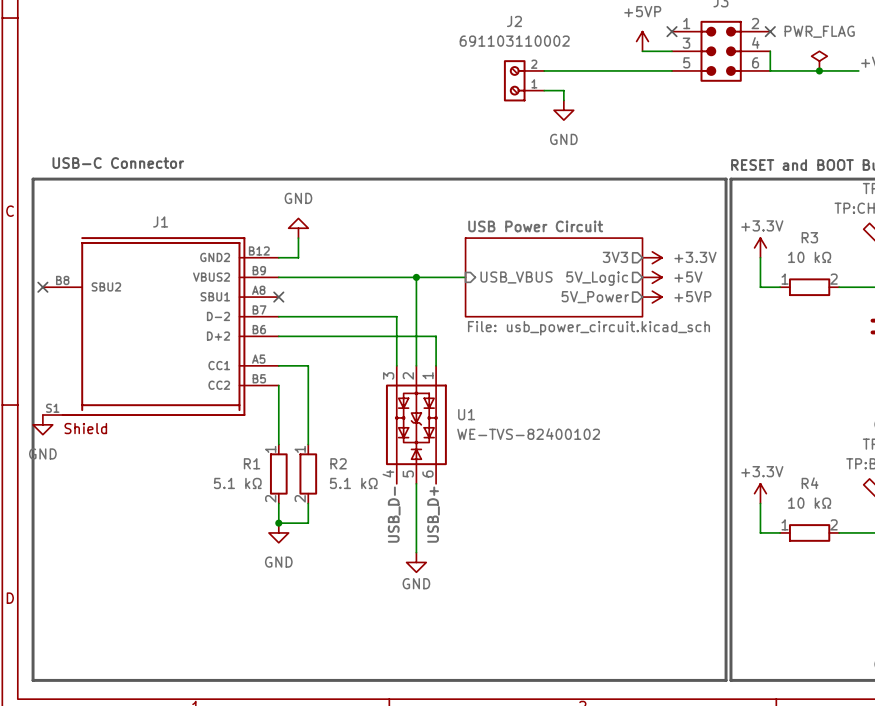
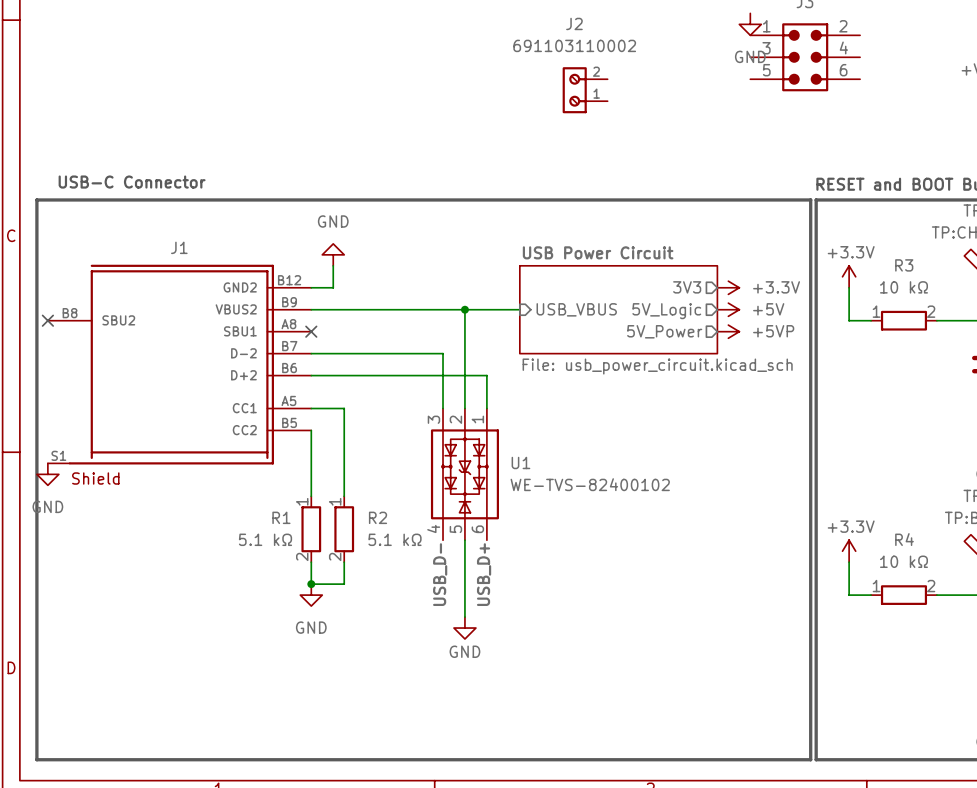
no-connect mark: (671, 31) -> none
no-connect mark: (770, 31) -> none
power symbol: +5VP (642, 41) -> none
wire: (642, 51) (671, 51) -> none
wire: (770, 51) (770, 70) (858, 70) -> none
power symbol: PWR_FLAG (819, 61) -> none
wire: (544, 70) (671, 70) -> none
junction: (819, 70) -> none
wire: (544, 90) (563, 90) (563, 100) -> none
power symbol position: GND (563, 110) -> GND (750, 24)

